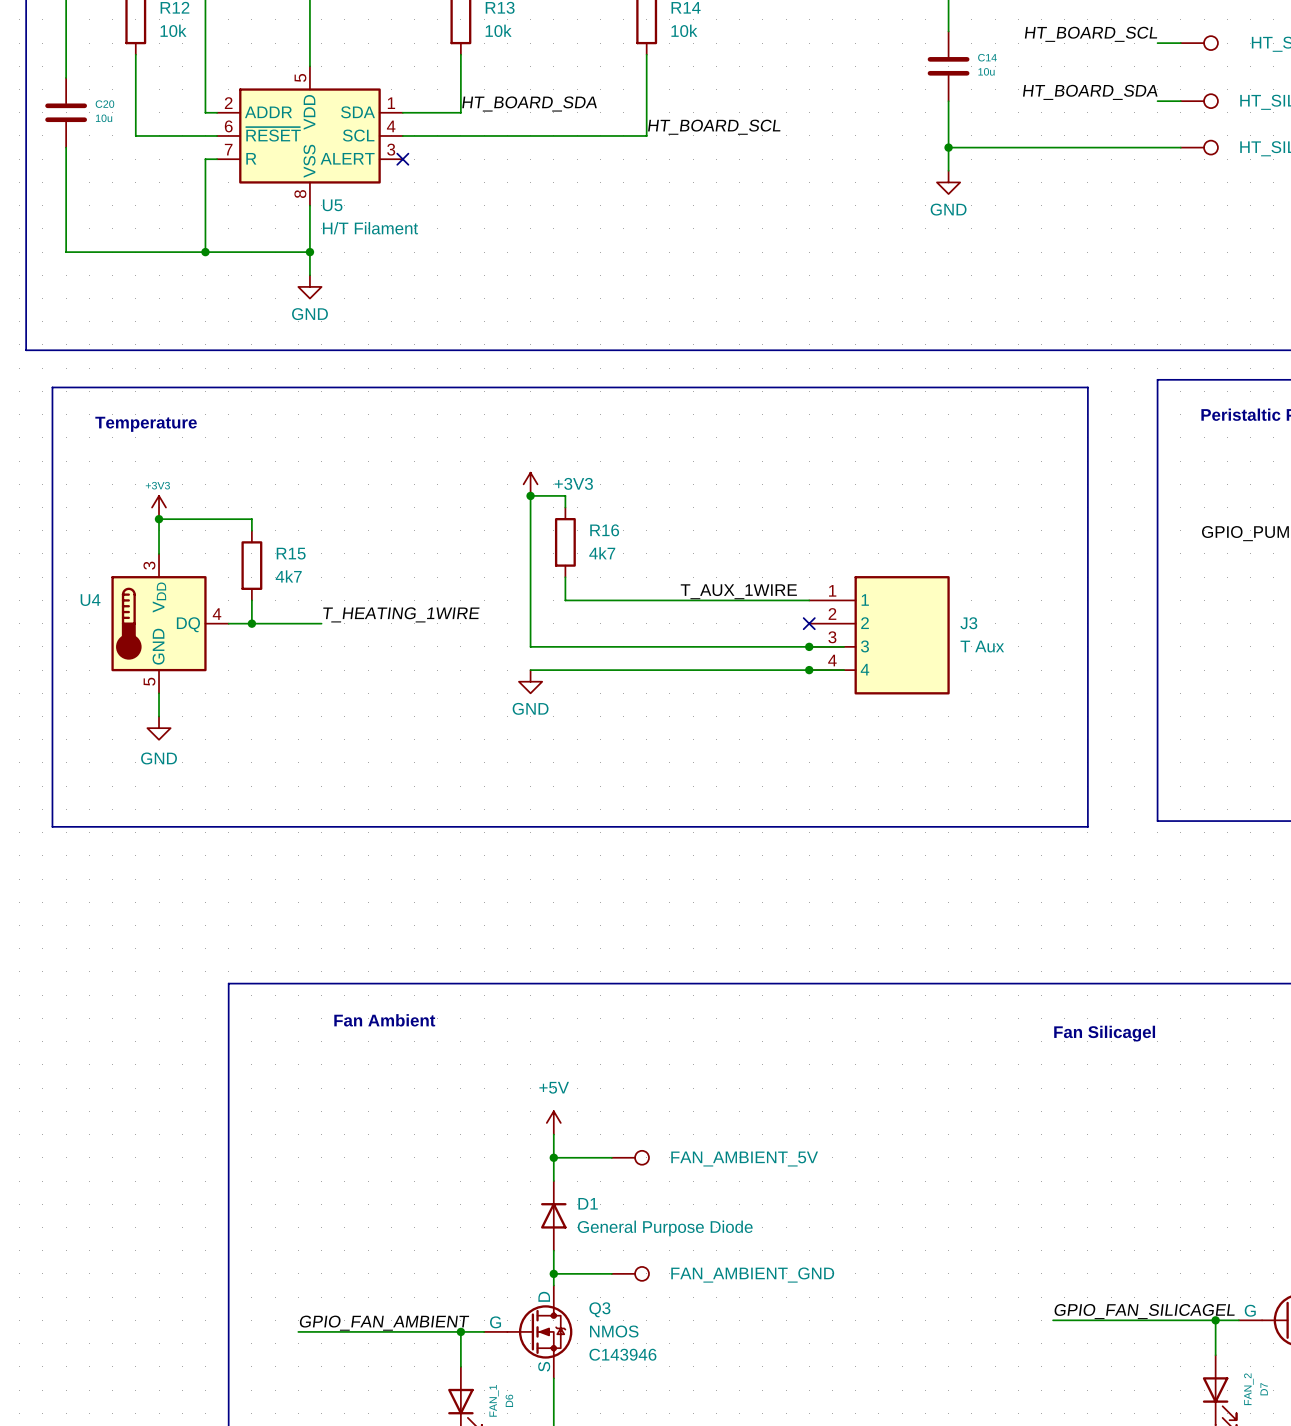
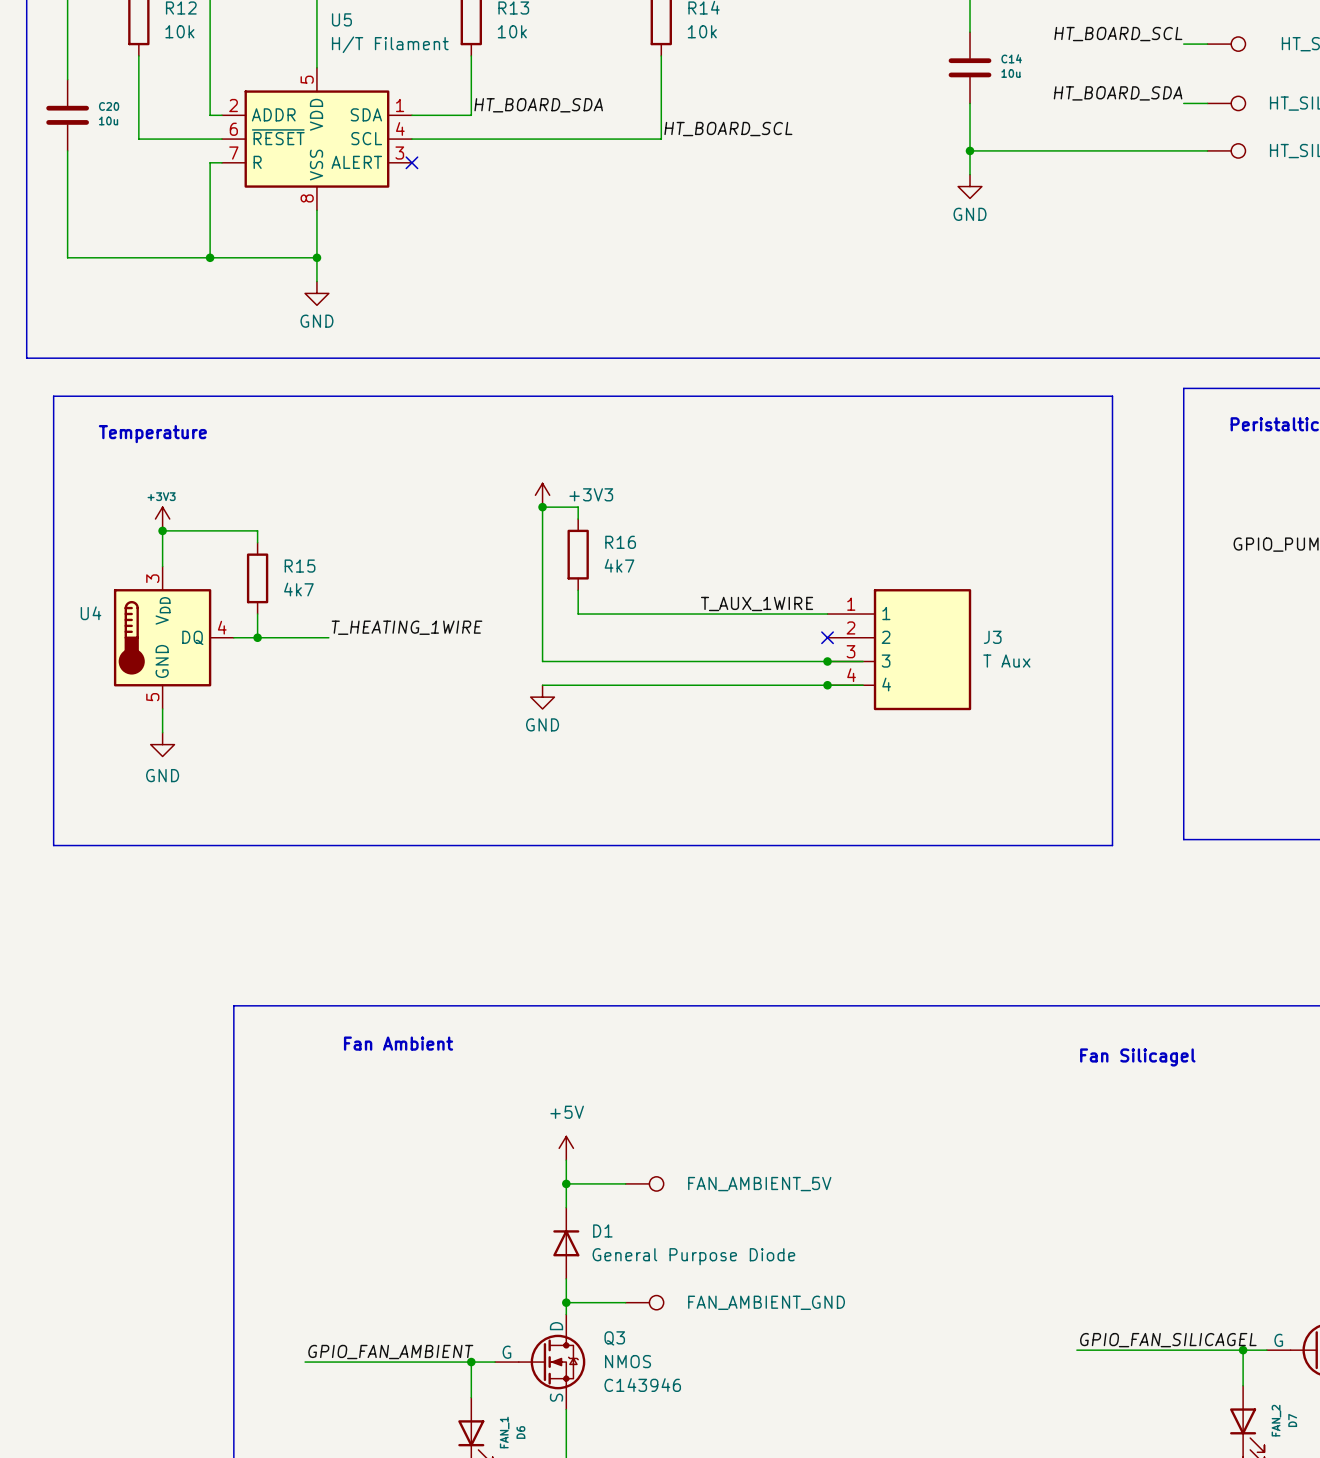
U5 name position: U5 (332, 205) -> U5 (341, 19)
U5 value position: H/T Filament (370, 228) -> H/T Filament (390, 44)

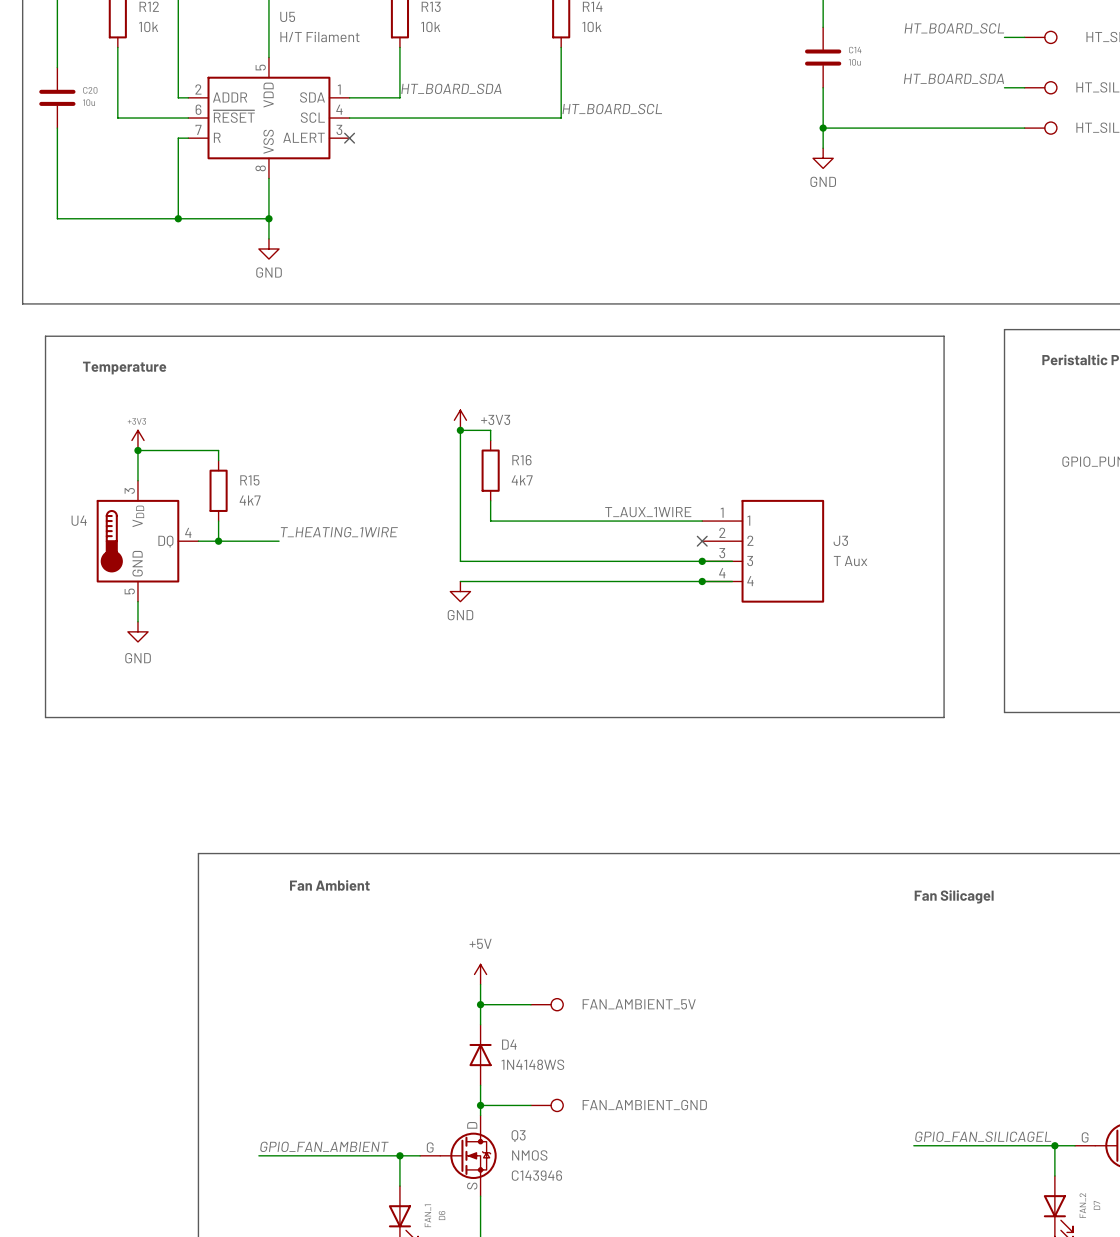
D1 name: D1 (602, 1230) -> D4 (509, 1044)
D1 value: General Purpose Diode (693, 1256) -> 1N4148WS (532, 1064)

